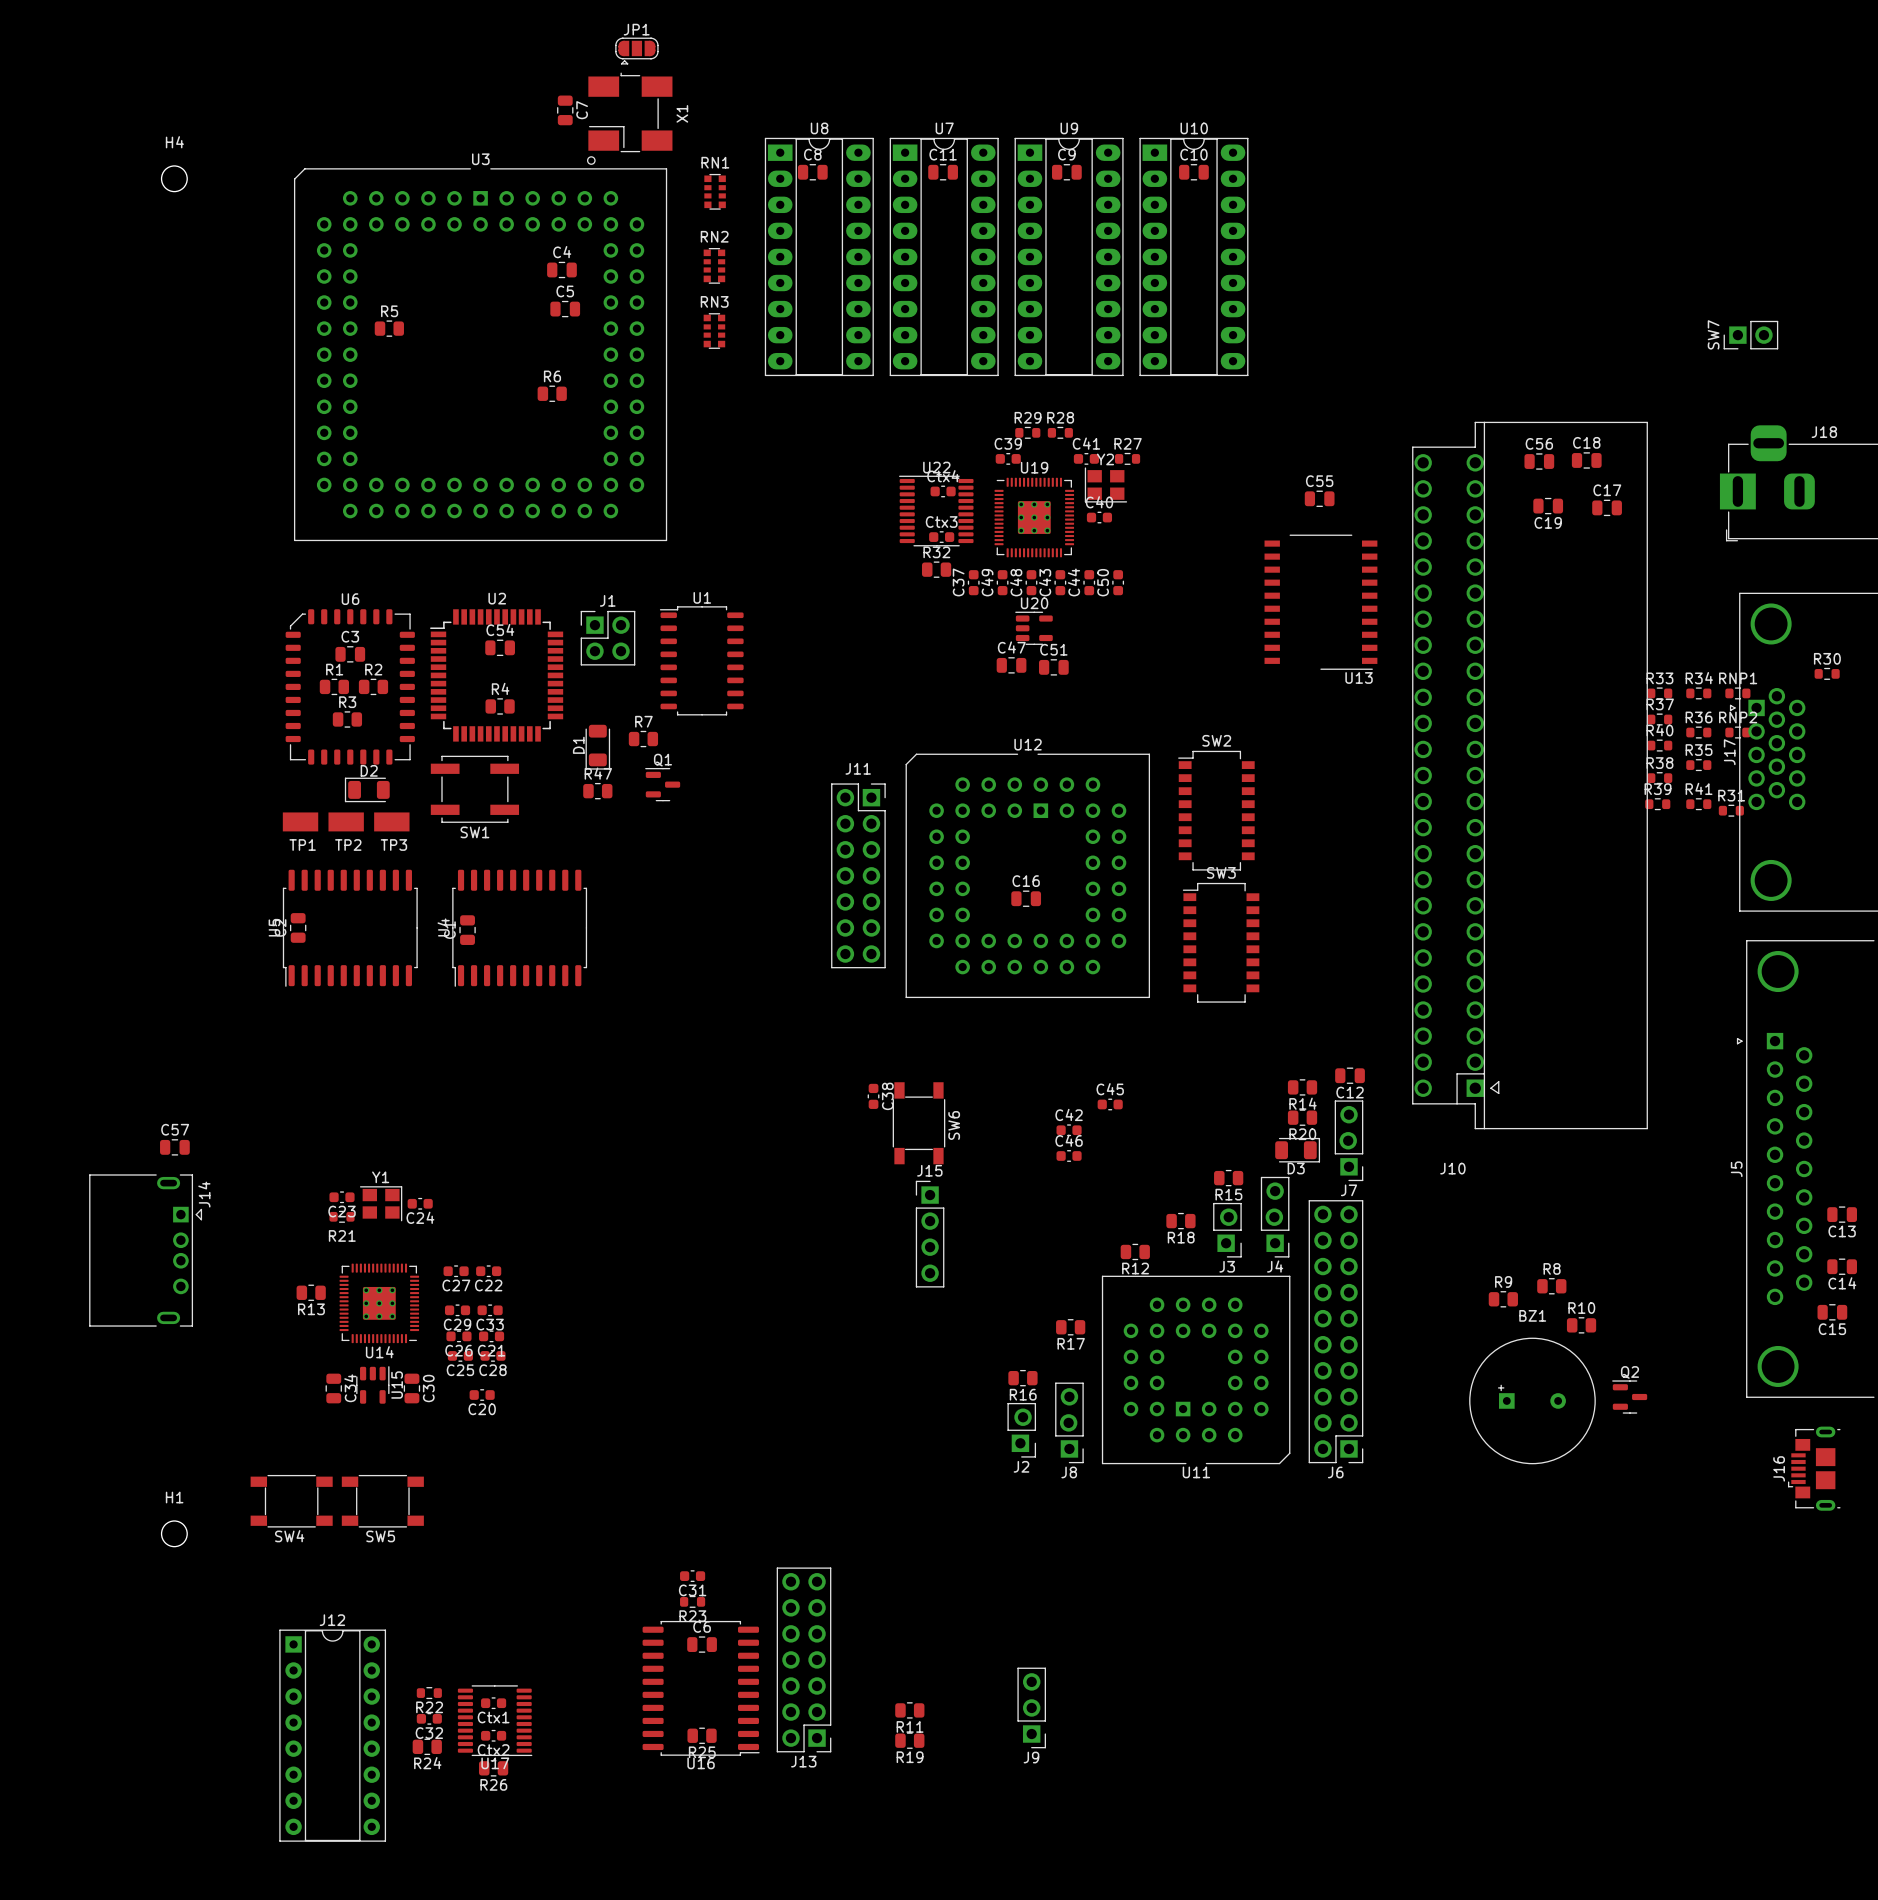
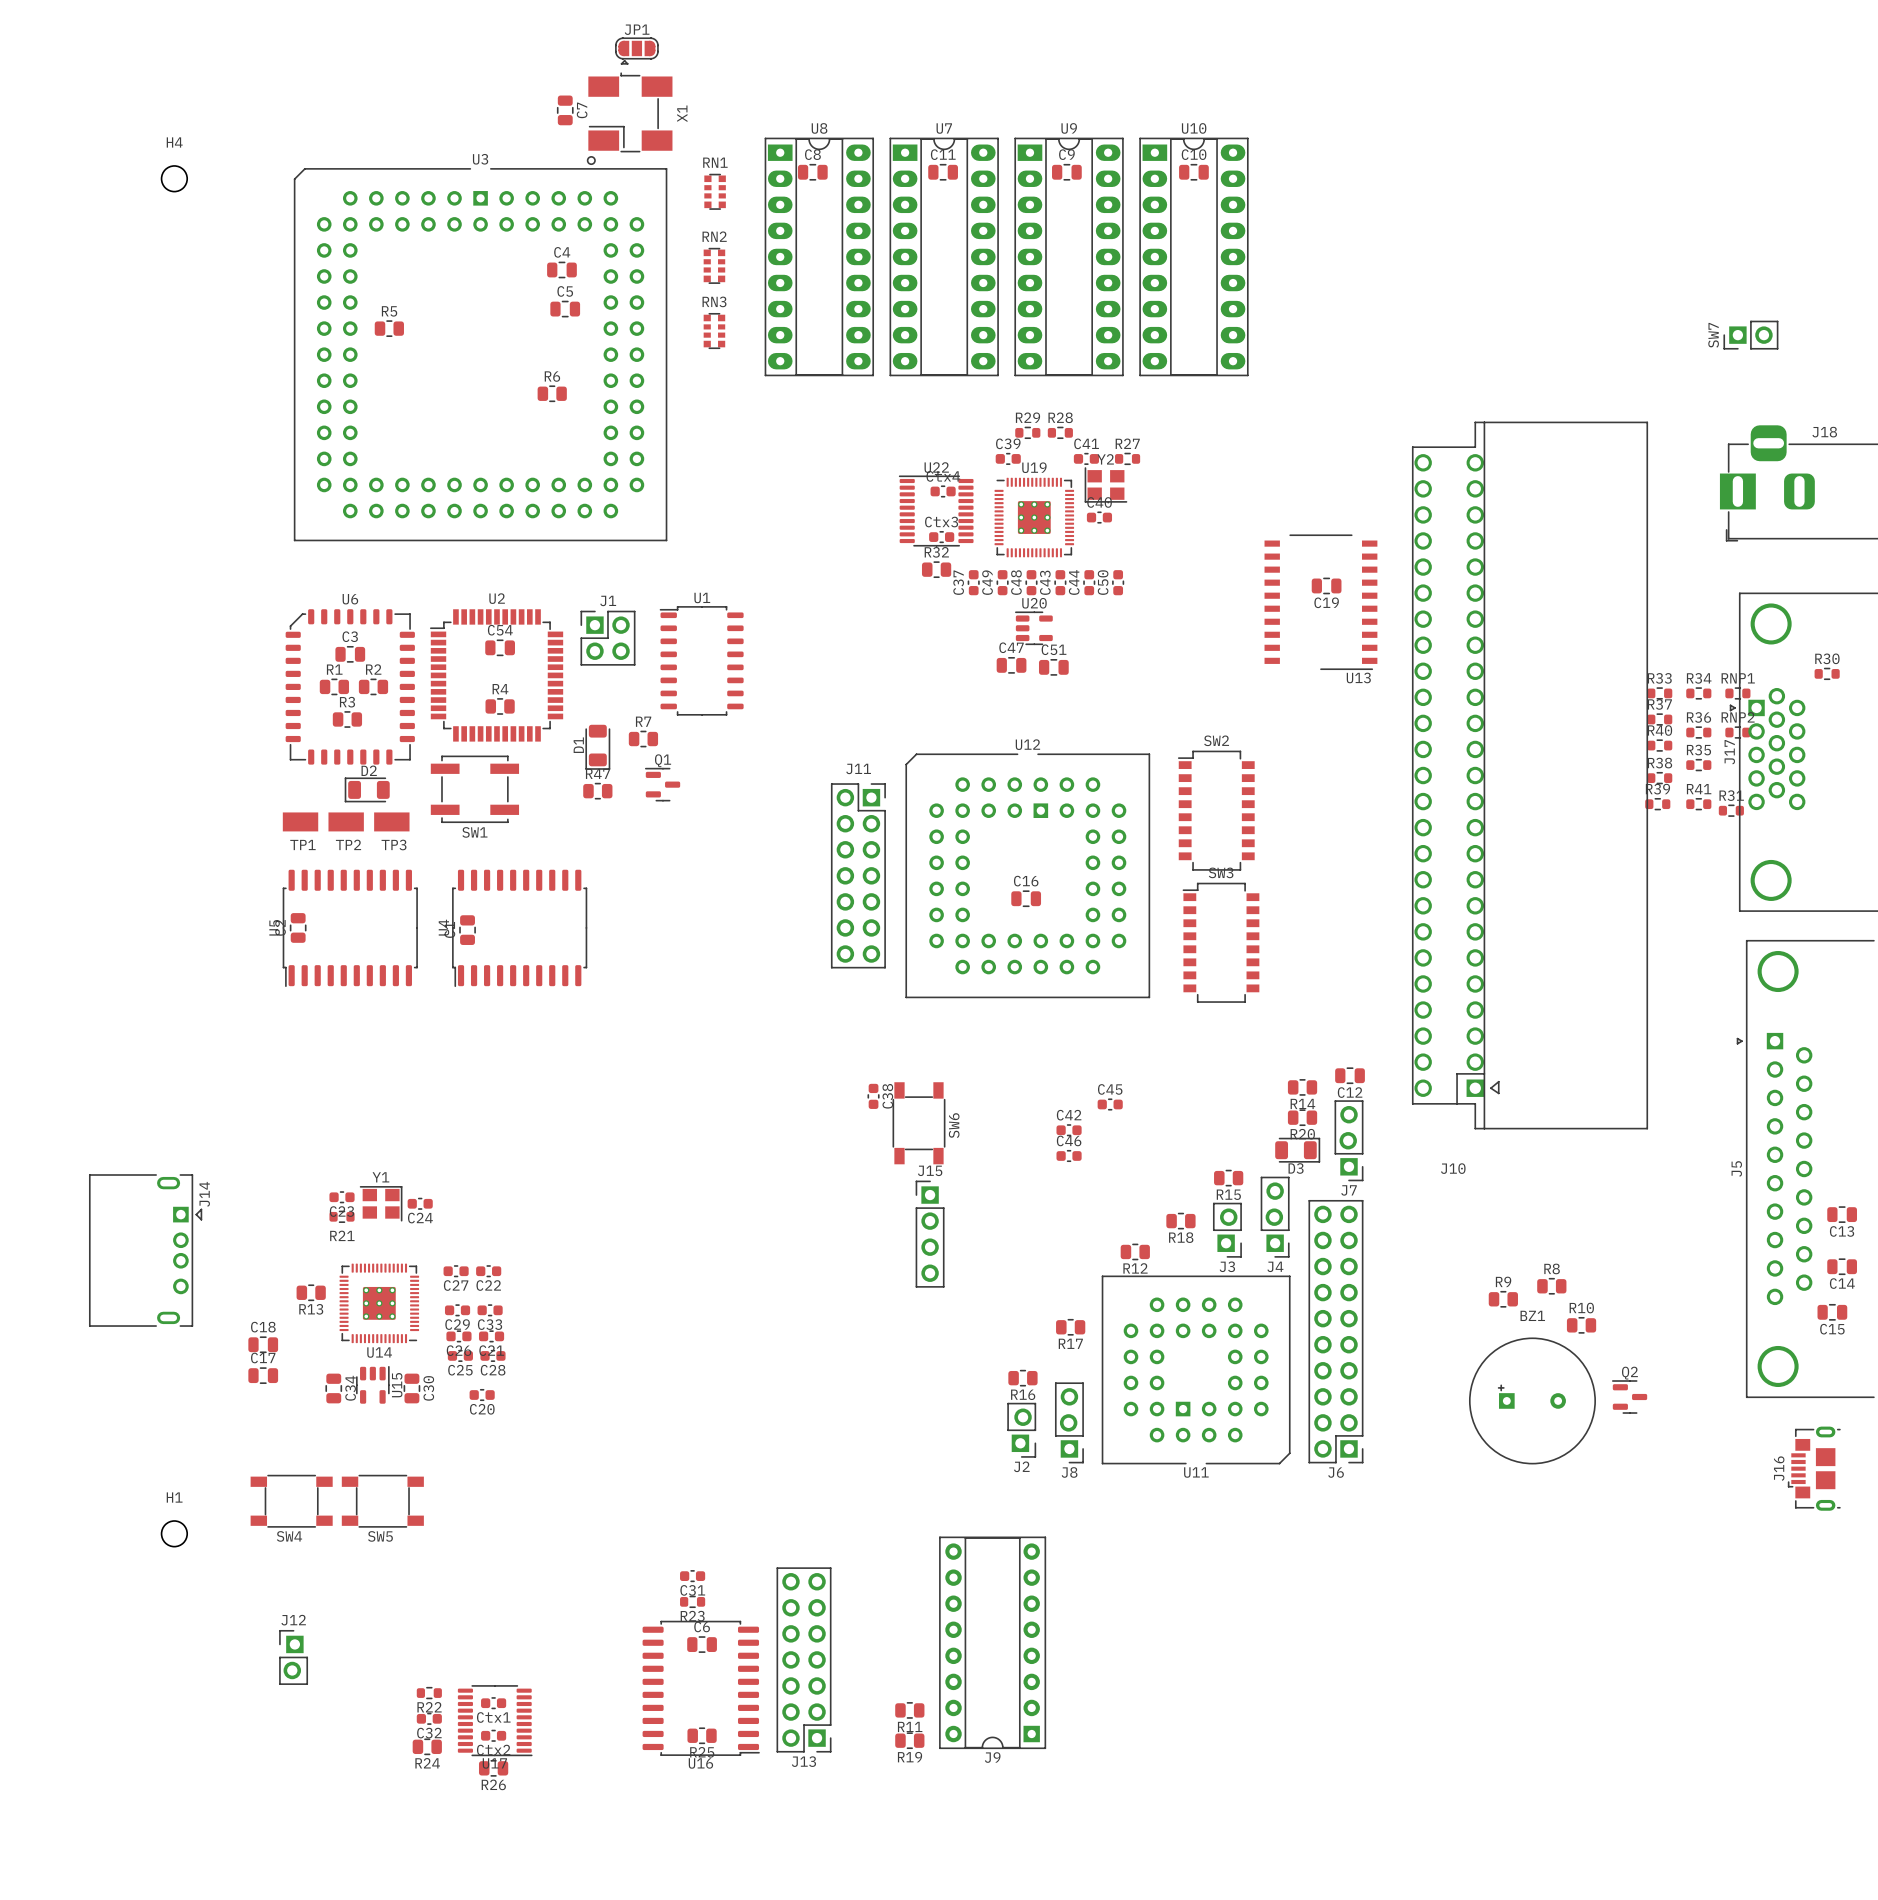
C18 position: (1586, 460) -> (263, 1344)
C56: (1539, 461) -> none
C55: (1319, 498) -> none
C19 position: (1548, 506) -> (1326, 585)
C17 position: (1607, 507) -> (263, 1375)
C57: (174, 1147) -> none
J12 name position: J12 (332, 1620) -> J12 (293, 1620)
J12 footprint: [279, 1629, 387, 1842] -> [279, 1630, 308, 1685]
J9 footprint: [1017, 1667, 1046, 1749] -> [939, 1536, 1046, 1749]
J9 name position: J9 (1031, 1757) -> J9 (992, 1757)

